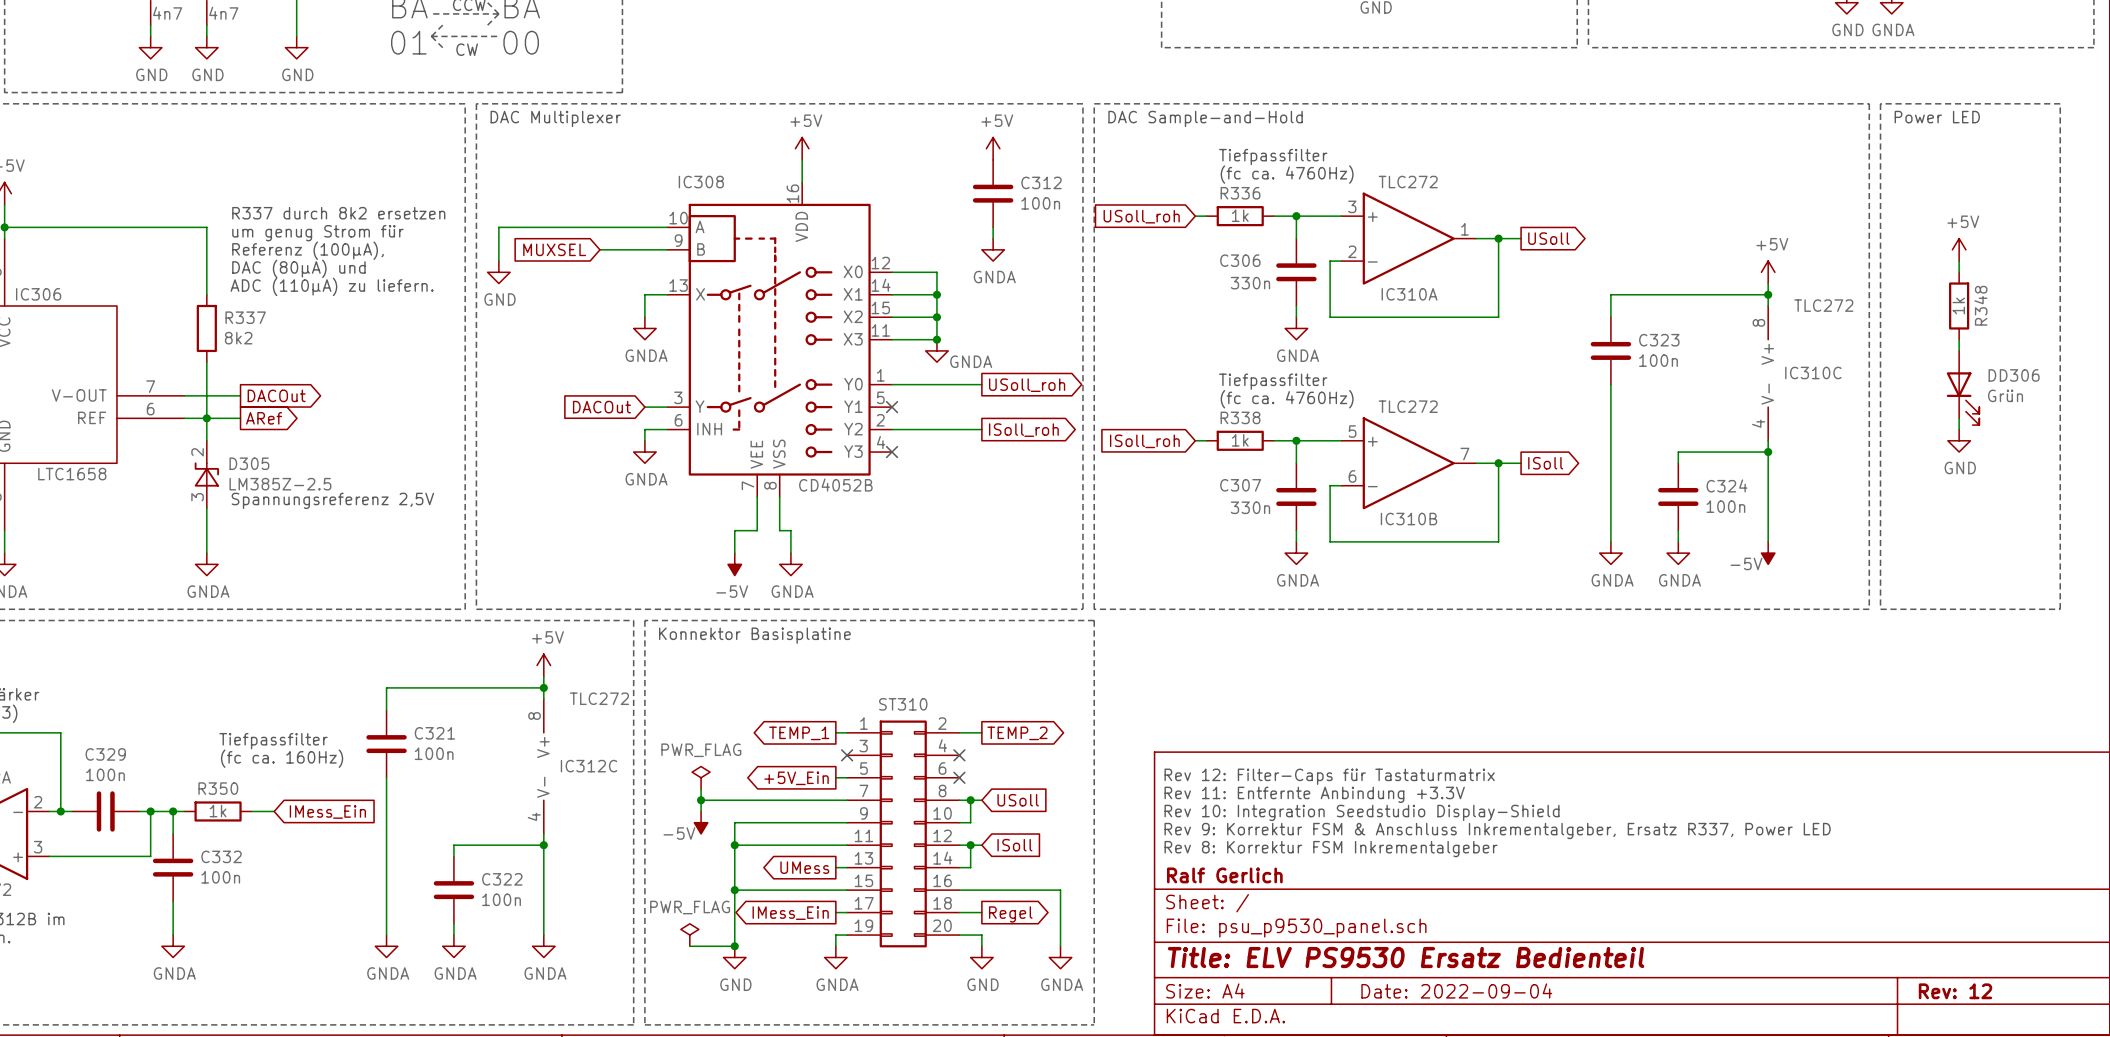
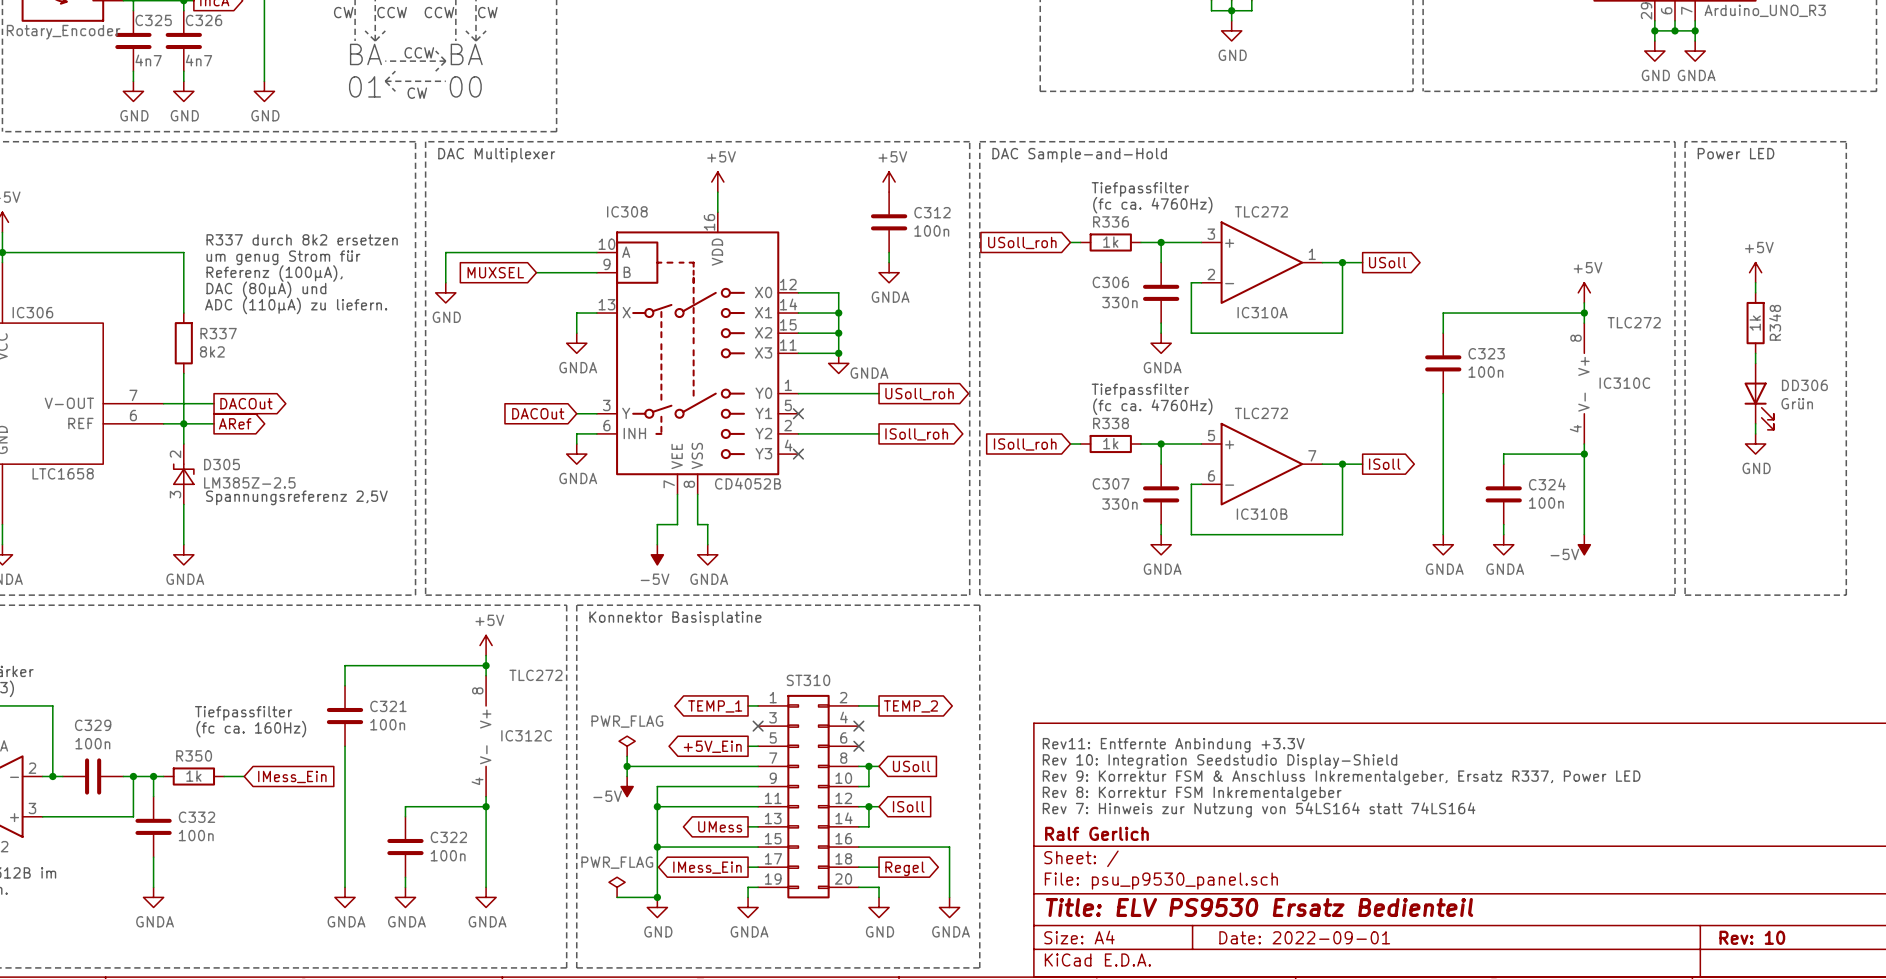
text: Rev 12: Filter-Caps für Tastaturmatrix (1329, 776) -> Rev11: Entfernte Anbindung +3.3V (1173, 745)
text: Rev 11: Entfernte Anbindung +3.3V (1314, 794) -> Rev 10: Integration Seedstudio Display-Shield (1219, 761)
text: Rev 10: Integration Seedstudio Display-Shield (1362, 812) -> Rev 9: Korrektur FSM & Anschluss Inkrementalgeber, Ersatz R337, Power LED (1341, 777)
text: Rev 9: Korrektur FSM & Anschluss Inkrementalgeber, Ersatz R337, Power LED (1497, 830) -> Rev 8: Korrektur FSM Inkrementalgeber (1192, 794)
text: Rev 8: Korrektur FSM Inkrementalgeber (1330, 849) -> Rev 7: Hinweis zur Nutzung von 54LS164 statt 74LS164 (1259, 809)
title block: Date: 2022-09-04 (1456, 990) -> Date: 2022-09-01 (1304, 937)
title block: Rev: 12 (1955, 991) -> Rev: 10 (1752, 937)

